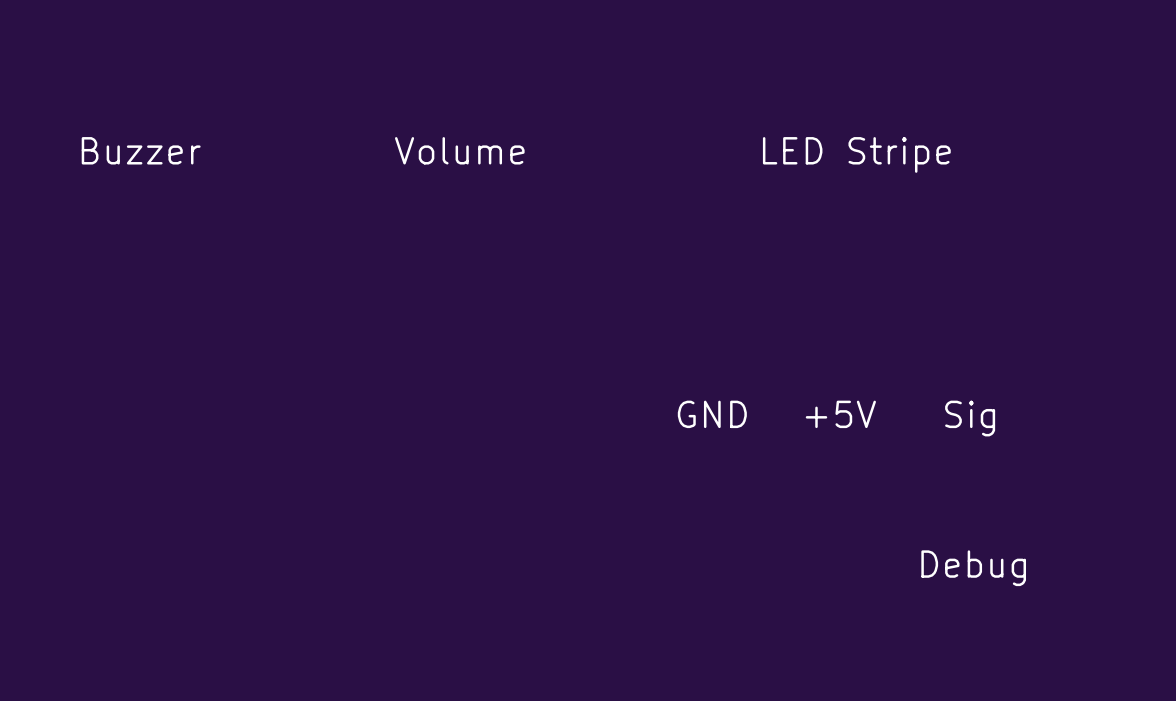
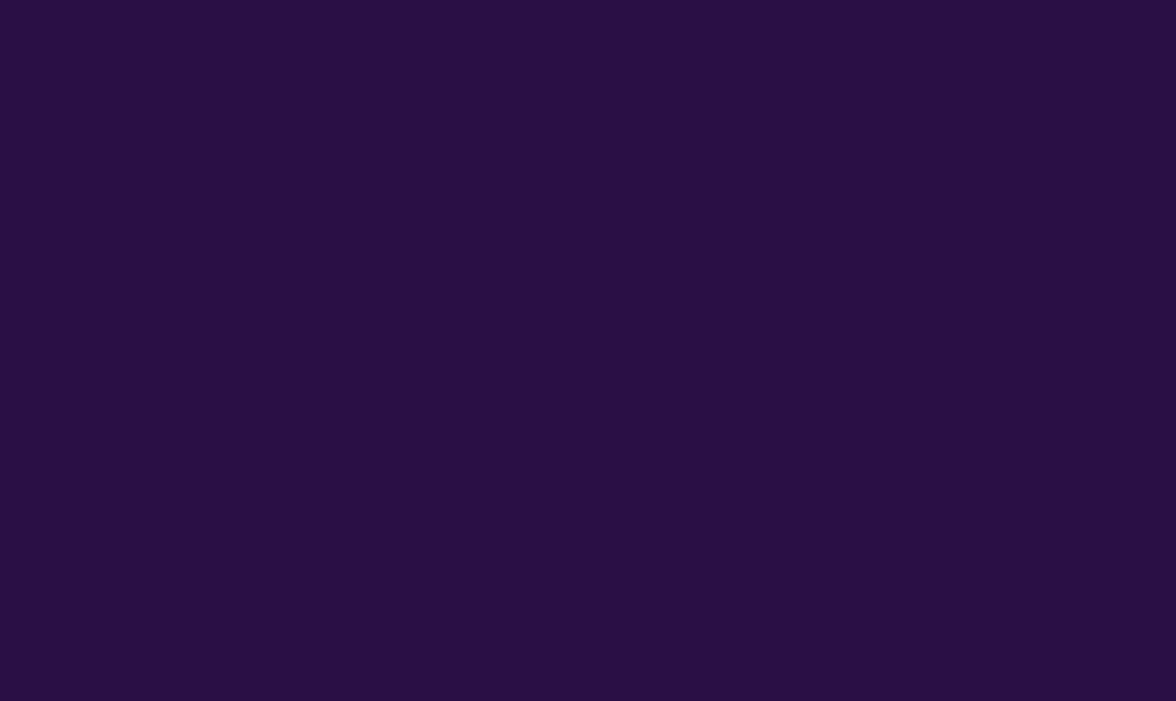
text: Buzzer (141, 150) -> none
text: Volume (459, 150) -> none
text: LED Stripe (856, 154) -> none
text: GND (712, 414) -> none
text: +5V (840, 414) -> none
text: Sig (970, 418) -> none
text: Debug (973, 568) -> none

